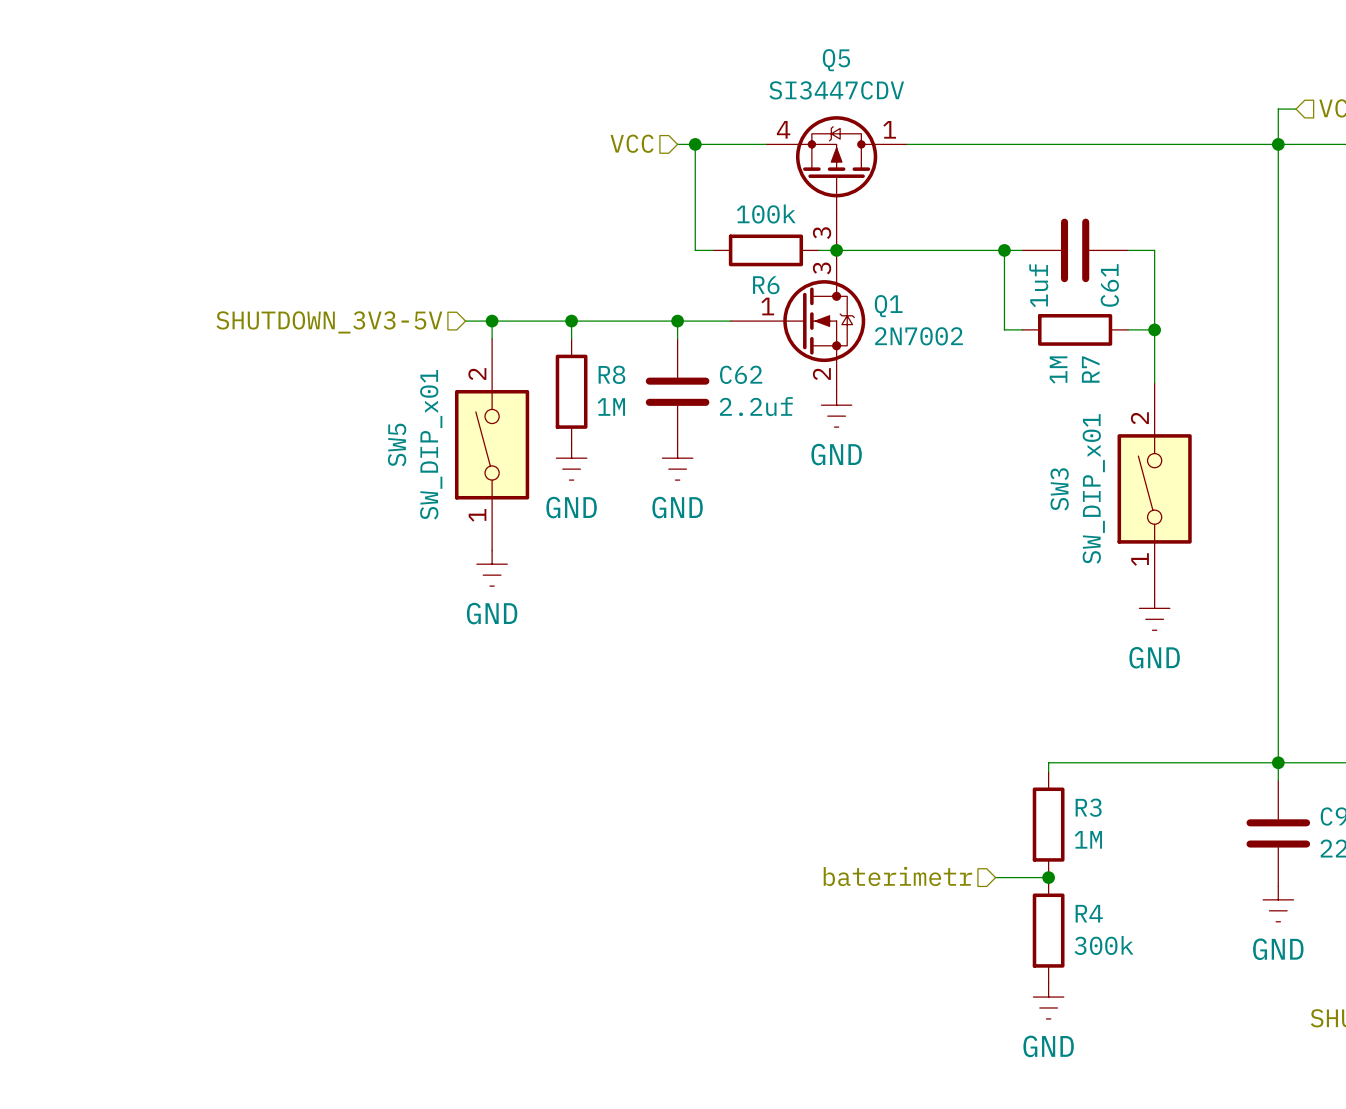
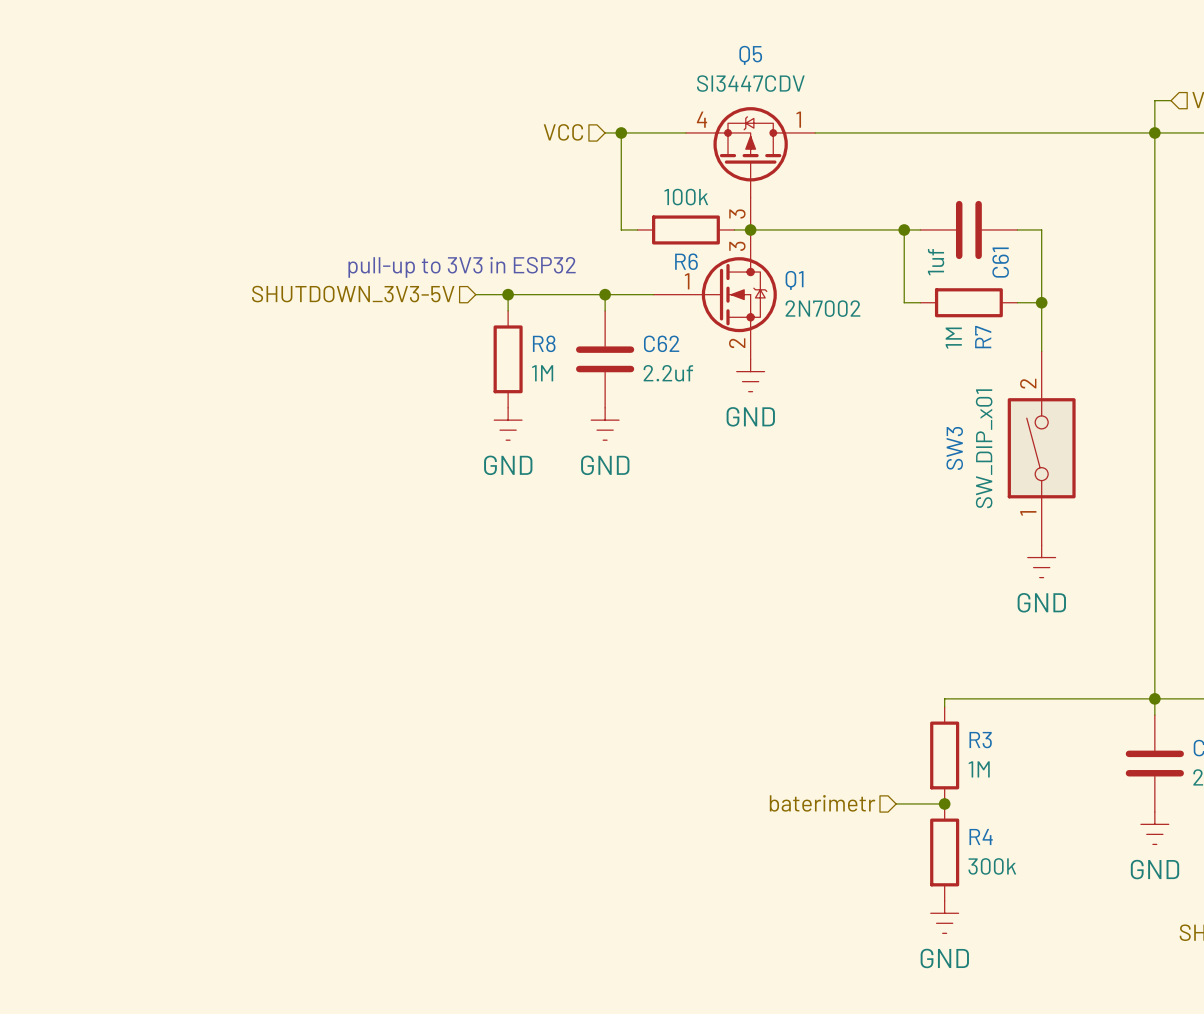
text: none -> pull-up to 3V3 in ESP32 (462, 267)
wire: (465, 321) (536, 321) -> none
wire: (492, 321) (492, 338) -> none
junction: (492, 321) -> none
hierarchical label position: SHUTDOWN_3V3-5V (329, 322) -> SHUTDOWN_3V3-5V (353, 294)
SW5: SW_DIP_x01 (492, 444) -> none
power symbol: GND (492, 568) -> none

